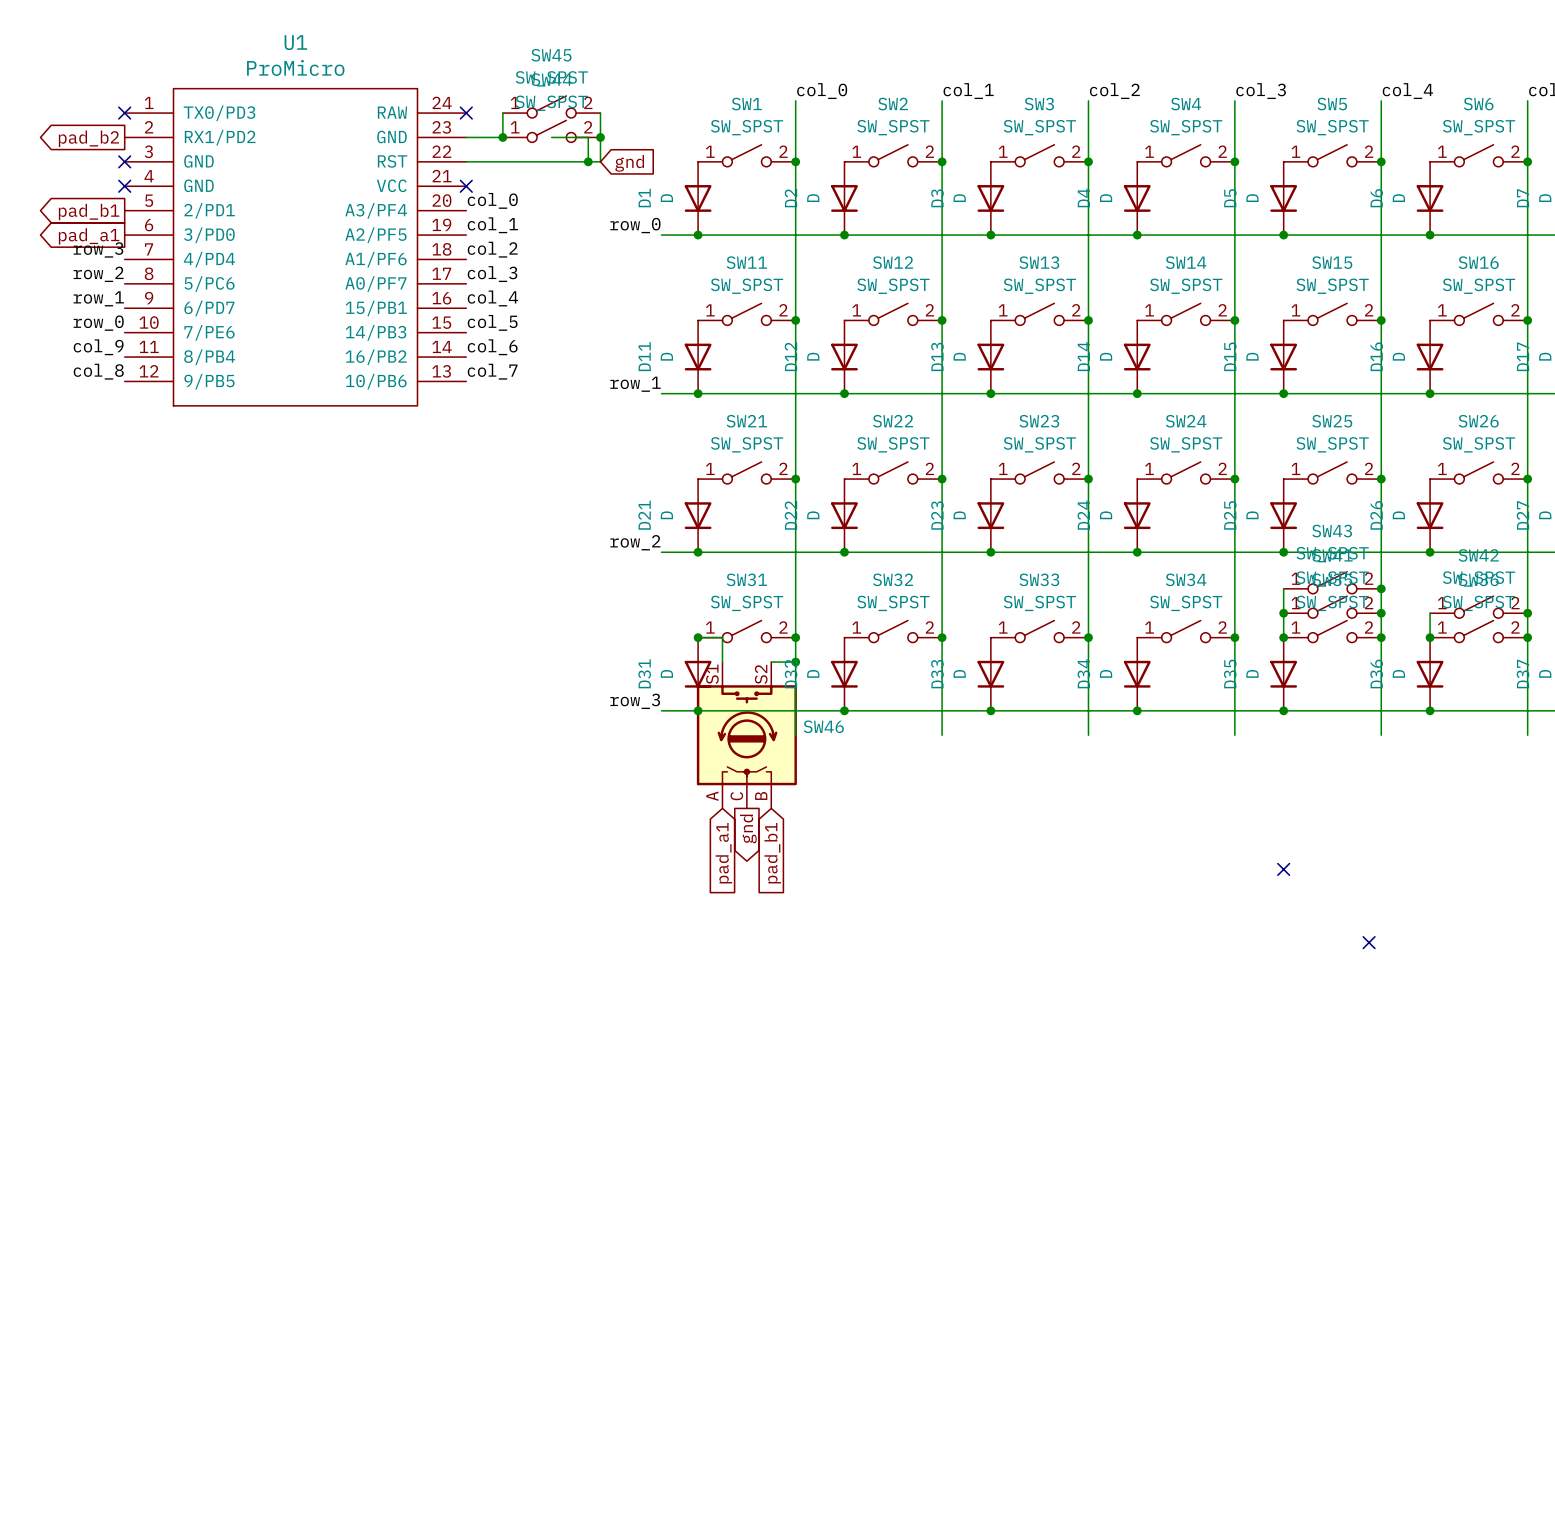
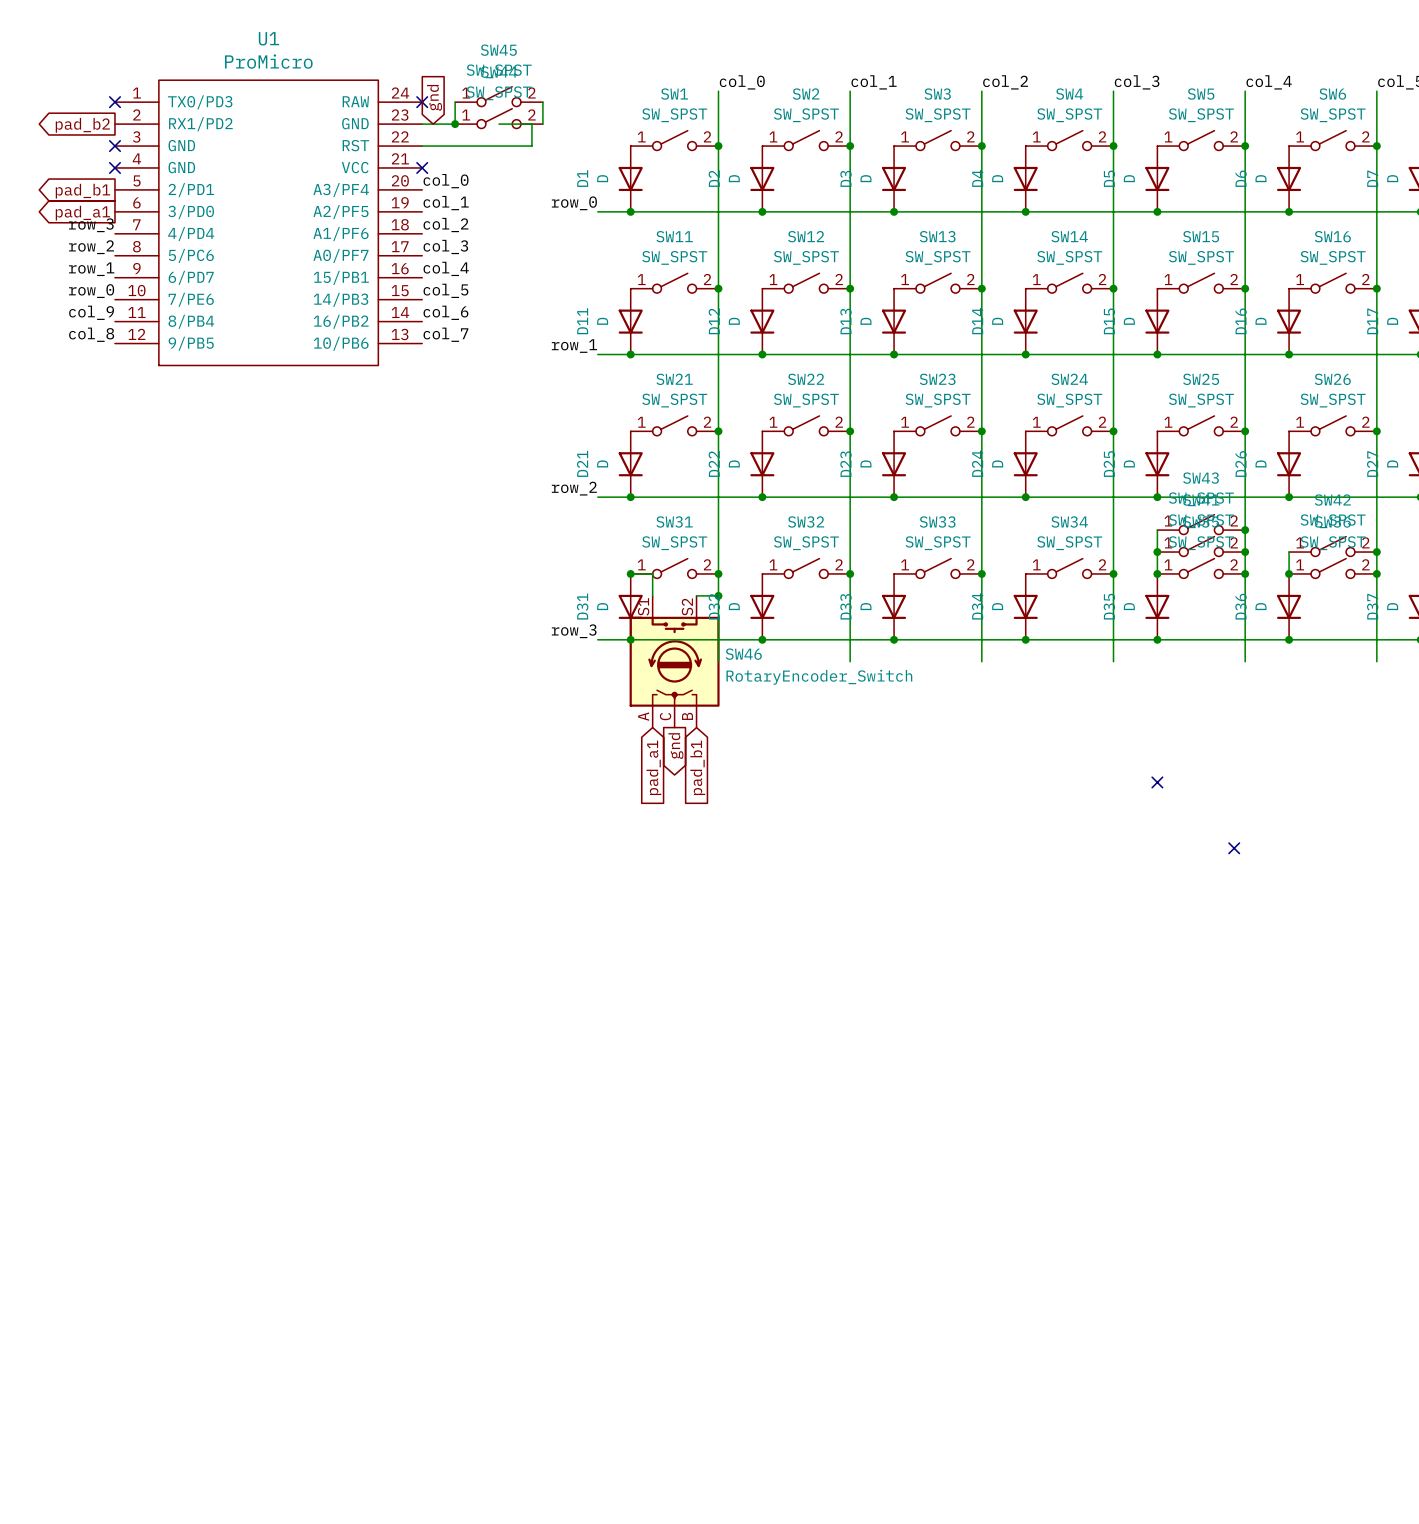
wire: (600, 137) (600, 161) (588, 161) -> none
junction: (600, 137) -> none
junction: (588, 161) -> none
global label rotation: 0° (629, 163) -> 90° counterclockwise (434, 97)
global label position: gnd (629, 163) -> gnd (434, 97)
SW46 value: none -> RotaryEncoder_Switch (819, 677)

